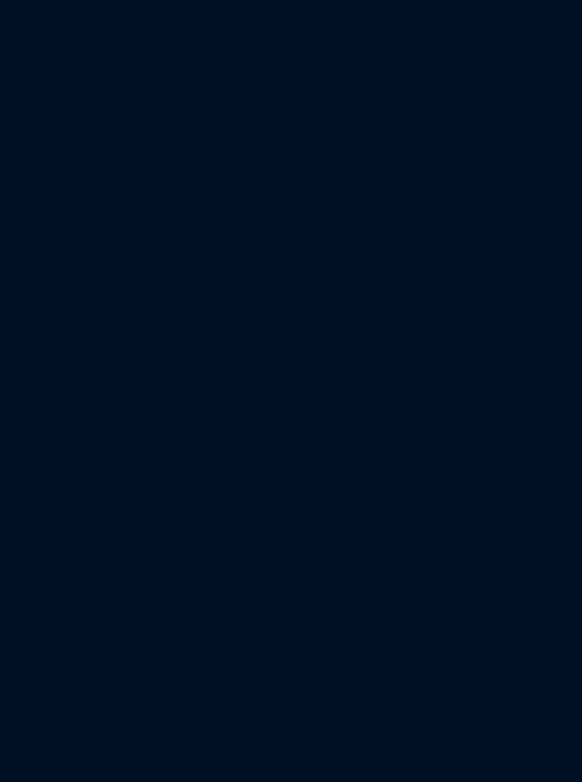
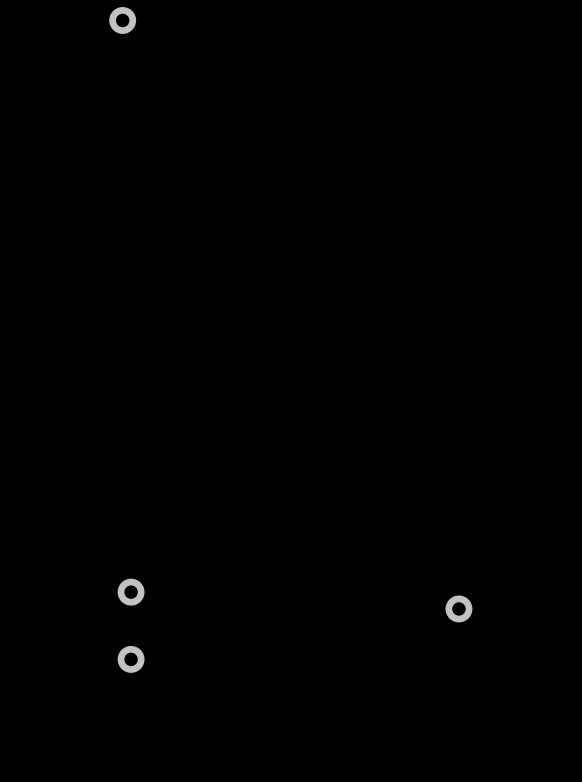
via: none -> (122, 20)
via: none -> (131, 592)
via: none -> (458, 608)
via: none -> (131, 659)

